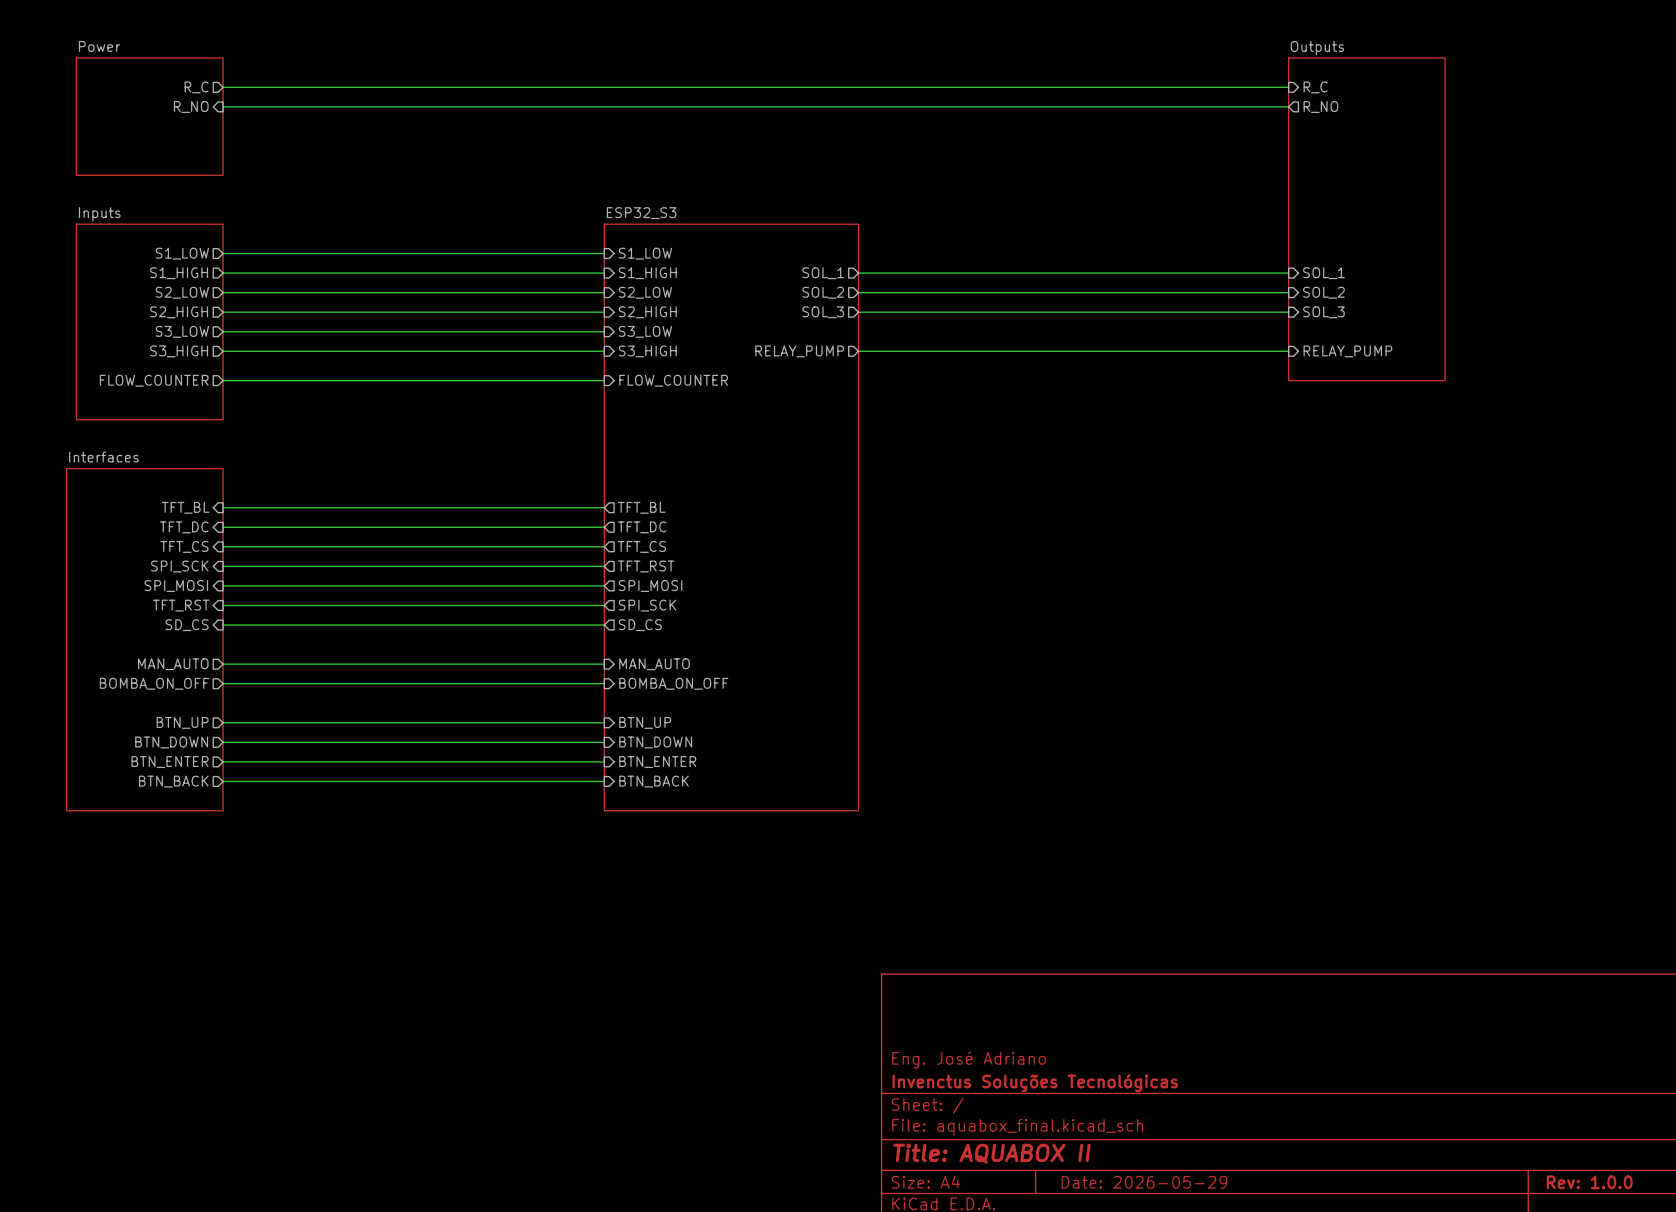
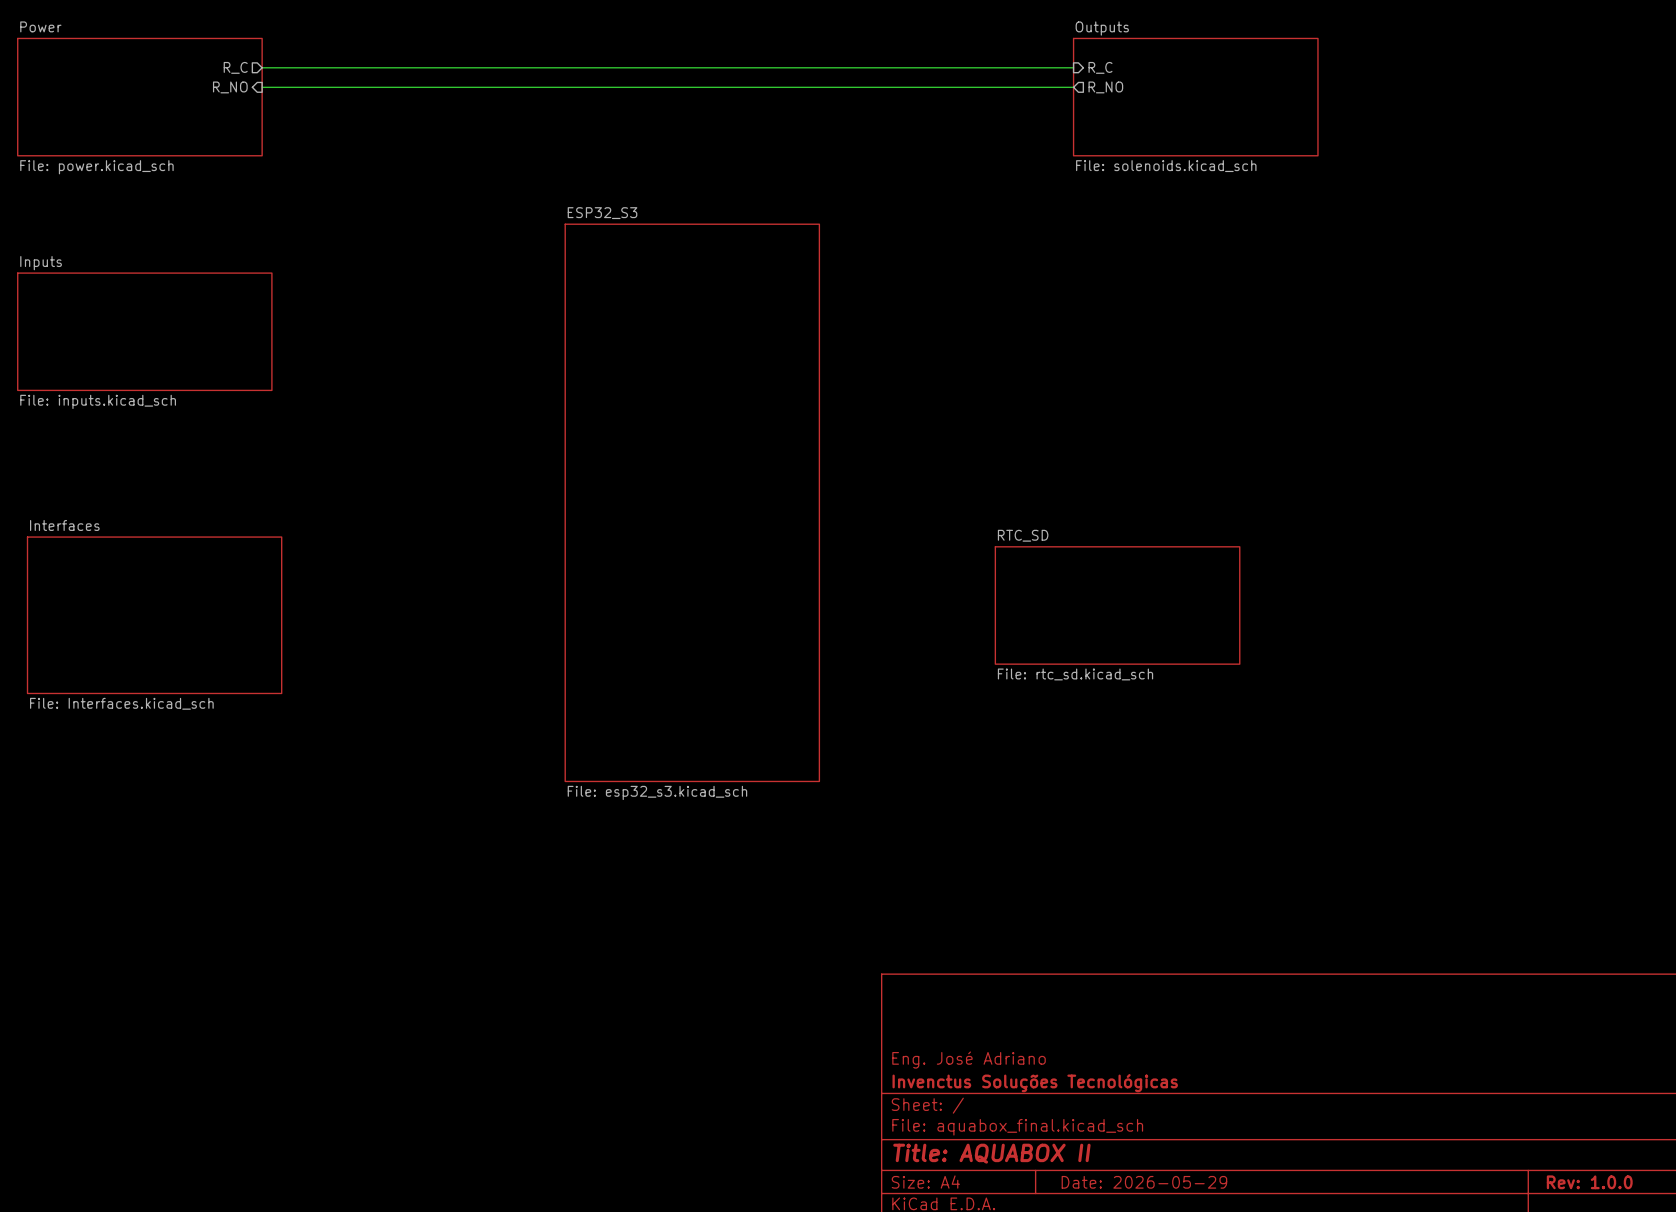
wire: none -> (262, 67) (1073, 67)
sheet pin: none -> R_C (1100, 67)
sheet pin position: R_C (196, 87) -> R_C (235, 67)
wire: (223, 87) (262, 87) -> none
wire: (1073, 87) (1288, 87) -> none
sheet pin: none -> R_NO (1105, 87)
sheet pin: R_C (1315, 87) -> none
sheet Power: none -> File: power.kicad_sch (139, 97)
sheet Outputs: none -> File: solenoids.kicad_sch (1195, 97)
sheet pin position: R_NO (191, 106) -> R_NO (230, 87)
wire: (223, 106) (1288, 106) -> none
sheet pin: R_NO (1320, 106) -> none
sheet Power: (149, 116) -> none
sheet Outputs: (1366, 219) -> none
sheet ESP32_S3 shape: [603, 223, 860, 812] -> [564, 223, 820, 783]
sheet pin: S1_LOW (182, 253) -> none
wire: (223, 253) (604, 253) -> none
sheet pin: S1_LOW (645, 253) -> none
sheet pin: S1_HIGH (179, 273) -> none
wire: (223, 273) (604, 273) -> none
sheet pin: S1_HIGH (647, 273) -> none
sheet pin: SOL_1 (823, 273) -> none
wire: (858, 273) (1288, 273) -> none
sheet pin: SOL_1 (1323, 273) -> none
sheet pin: S2_LOW (182, 292) -> none
wire: (223, 292) (604, 292) -> none
sheet pin: S2_LOW (645, 292) -> none
sheet pin: SOL_2 (823, 292) -> none
wire: (858, 292) (1288, 292) -> none
sheet pin: SOL_2 (1323, 292) -> none
sheet pin: S2_HIGH (179, 312) -> none
wire: (223, 312) (604, 312) -> none
sheet pin: S2_HIGH (647, 312) -> none
sheet pin: SOL_3 (823, 312) -> none
wire: (858, 312) (1288, 312) -> none
sheet pin: SOL_3 (1323, 312) -> none
sheet Inputs: (149, 321) -> none
sheet Inputs: none -> File: inputs.kicad_sch (144, 331)
sheet pin: S3_LOW (182, 331) -> none
wire: (223, 331) (604, 331) -> none
sheet pin: S3_LOW (645, 331) -> none
sheet pin: S3_HIGH (179, 351) -> none
wire: (223, 351) (604, 351) -> none
sheet pin: S3_HIGH (647, 351) -> none
sheet pin: RELAY_PUMP (799, 351) -> none
wire: (858, 351) (1288, 351) -> none
sheet pin: RELAY_PUMP (1347, 351) -> none
sheet pin: FLOW_COUNTER (154, 380) -> none
wire: (223, 380) (604, 380) -> none
sheet pin: FLOW_COUNTER (673, 380) -> none
sheet pin: TFT_BL (185, 507) -> none
wire: (223, 507) (604, 507) -> none
sheet pin: TFT_BL (641, 507) -> none
sheet pin: TFT_DC (184, 527) -> none
wire: (223, 527) (604, 527) -> none
sheet pin: TFT_DC (642, 527) -> none
sheet pin: TFT_CS (184, 546) -> none
wire: (223, 546) (604, 546) -> none
sheet pin: TFT_CS (641, 546) -> none
sheet pin: SPI_SCK (179, 566) -> none
wire: (223, 566) (604, 566) -> none
sheet pin: TFT_RST (646, 566) -> none
wire: (223, 585) (604, 585) -> none
sheet pin: SPI_MOSI (176, 586) -> none
sheet pin: SPI_MOSI (650, 586) -> none
sheet pin: TFT_RST (181, 605) -> none
wire: (223, 605) (604, 605) -> none
sheet pin: SPI_SCK (647, 605) -> none
sheet RTC_SD: none -> File: rtc_sd.kicad_sch (1117, 605)
sheet Interfaces: none -> File: Interfaces.kicad_sch (154, 615)
sheet pin: SD_CS (187, 625) -> none
wire: (223, 625) (604, 625) -> none
sheet pin: SD_CS (640, 625) -> none
sheet Interfaces: (144, 639) -> none
sheet pin: MAN_AUTO (173, 664) -> none
wire: (223, 664) (604, 664) -> none
sheet pin: MAN_AUTO (654, 664) -> none
sheet pin: BOMBA_ON_OFF (154, 683) -> none
wire: (223, 683) (604, 683) -> none
sheet pin: BOMBA_ON_OFF (673, 683) -> none
sheet pin: BTN_UP (182, 722) -> none
wire: (223, 722) (604, 722) -> none
sheet pin: BTN_UP (645, 722) -> none
sheet pin: BTN_DOWN (171, 742) -> none
wire: (223, 742) (604, 742) -> none
sheet pin: BTN_DOWN (655, 742) -> none
wire: (223, 761) (604, 761) -> none
sheet pin: BTN_ENTER (170, 762) -> none
sheet pin: BTN_ENTER (657, 762) -> none
sheet pin: BTN_BACK (173, 781) -> none
wire: (223, 781) (604, 781) -> none
sheet pin: BTN_BACK (654, 781) -> none
sheet ESP32_S3 value: none -> File: esp32_s3.kicad_sch (657, 792)

